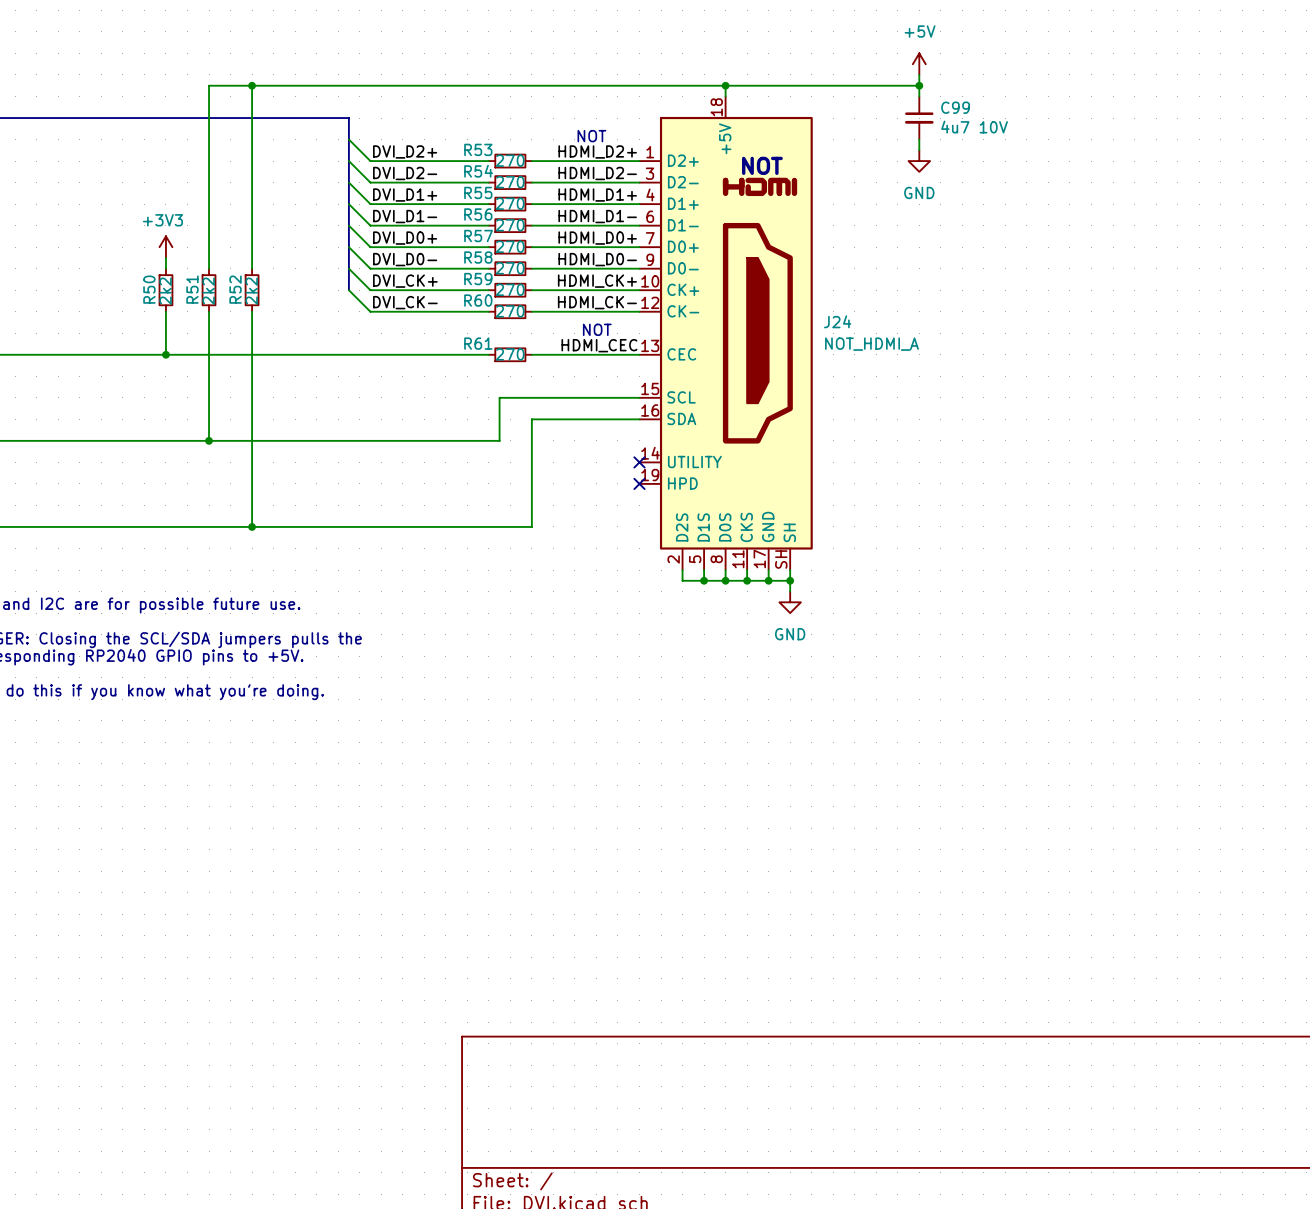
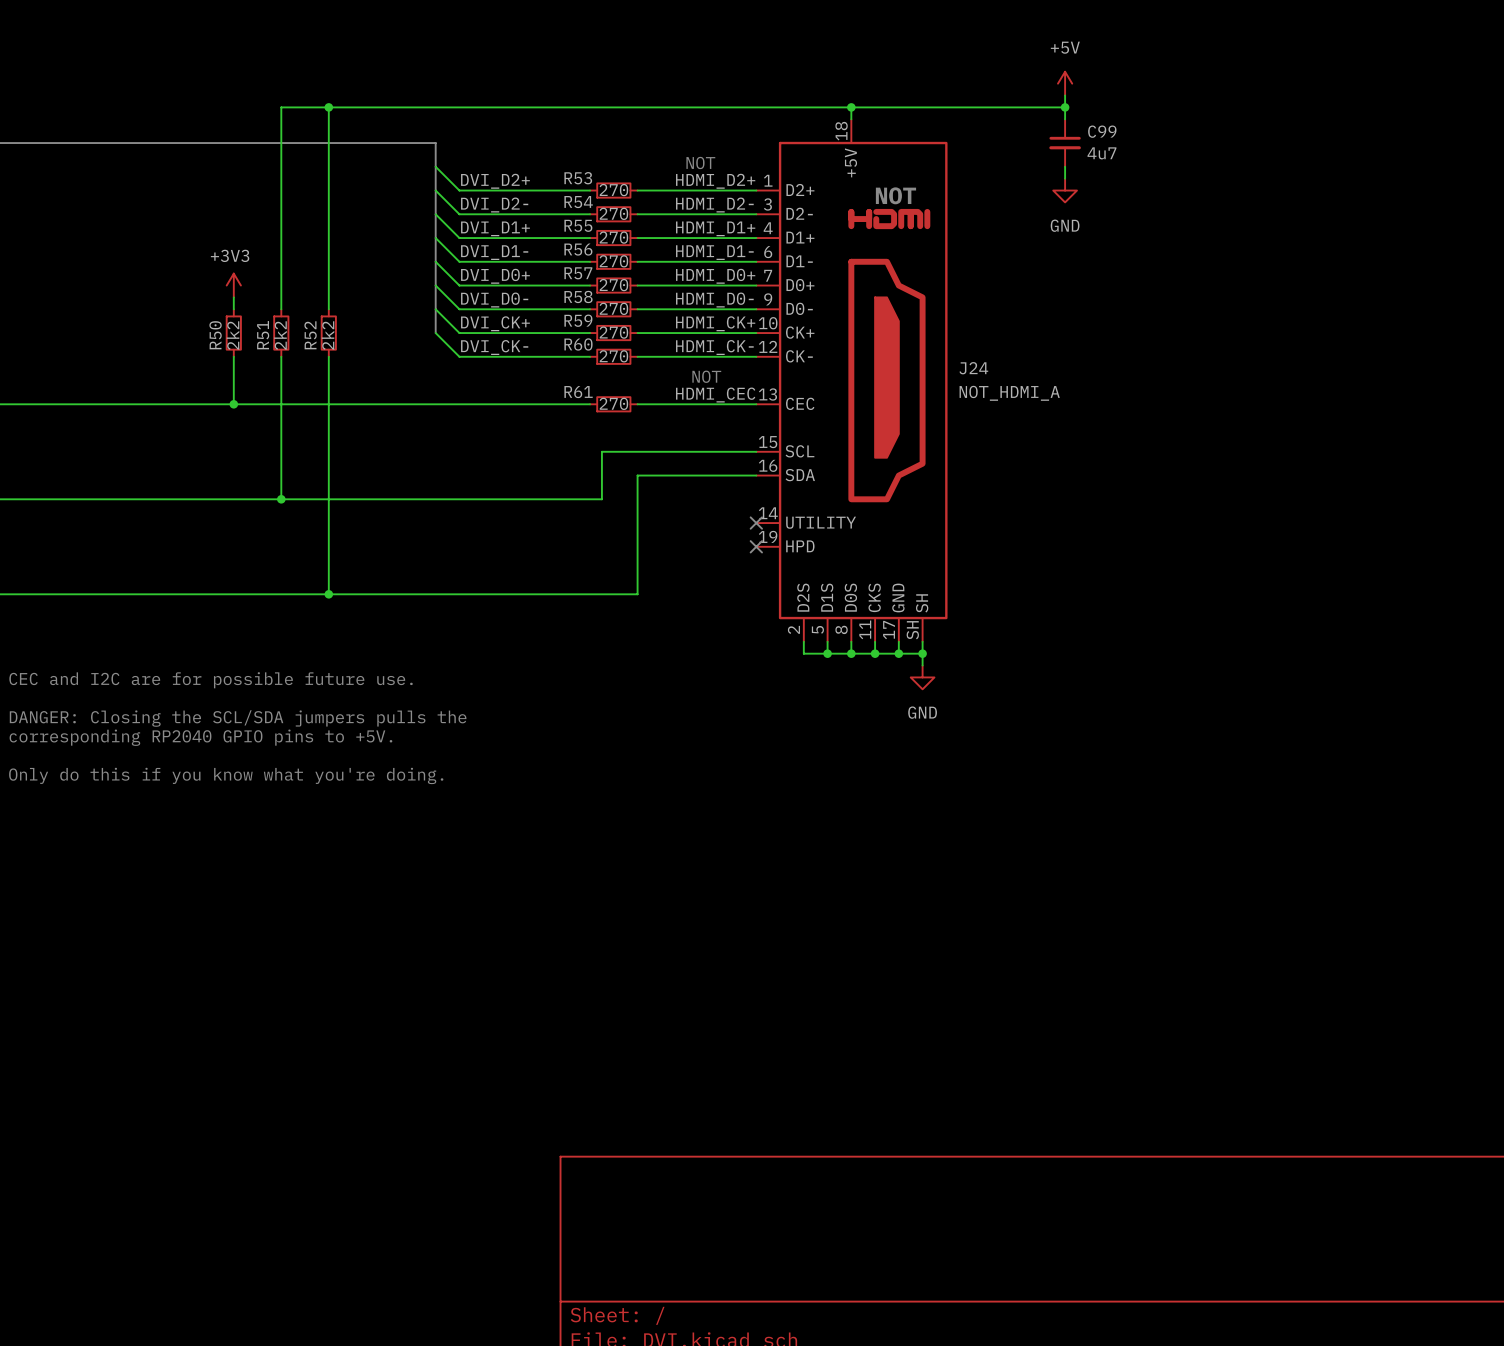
C99 value: 4u7 10V (974, 127) -> 4u7 (1101, 153)

